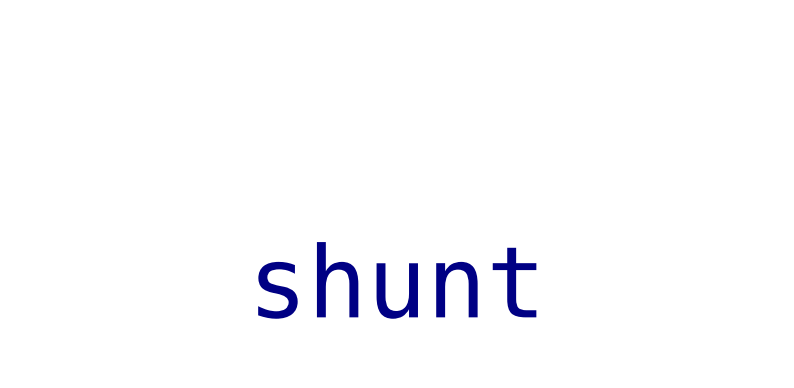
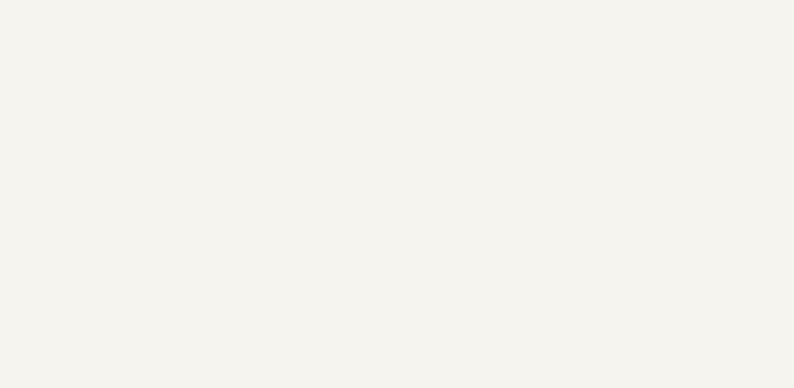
text: shunt (397, 280) -> none

